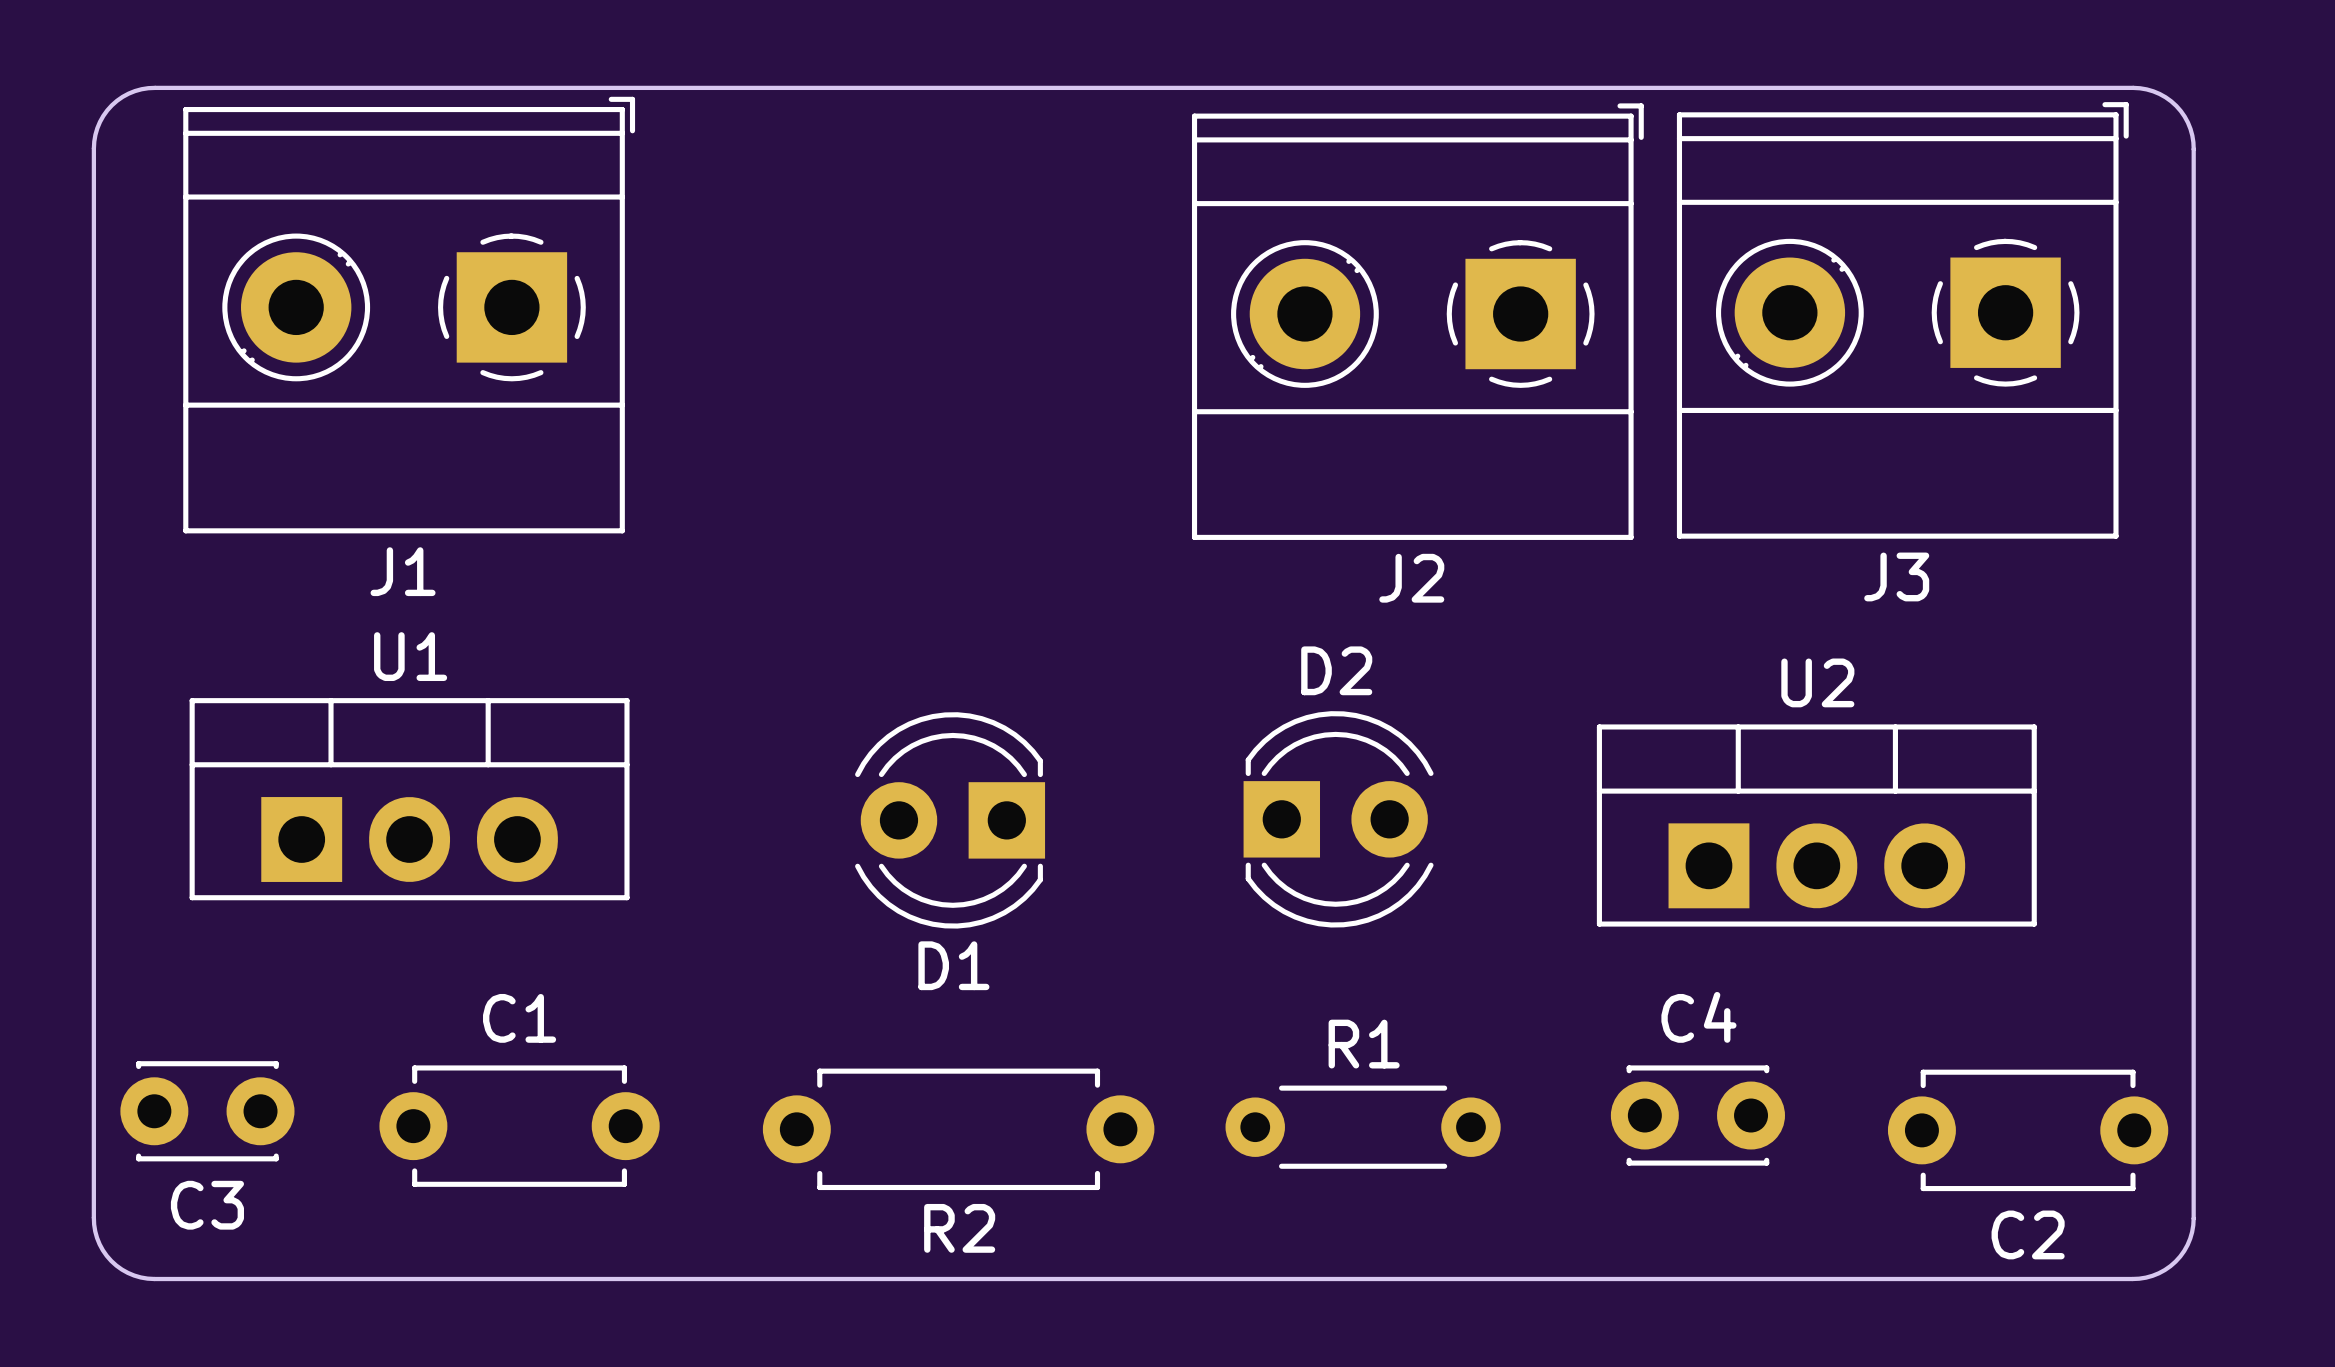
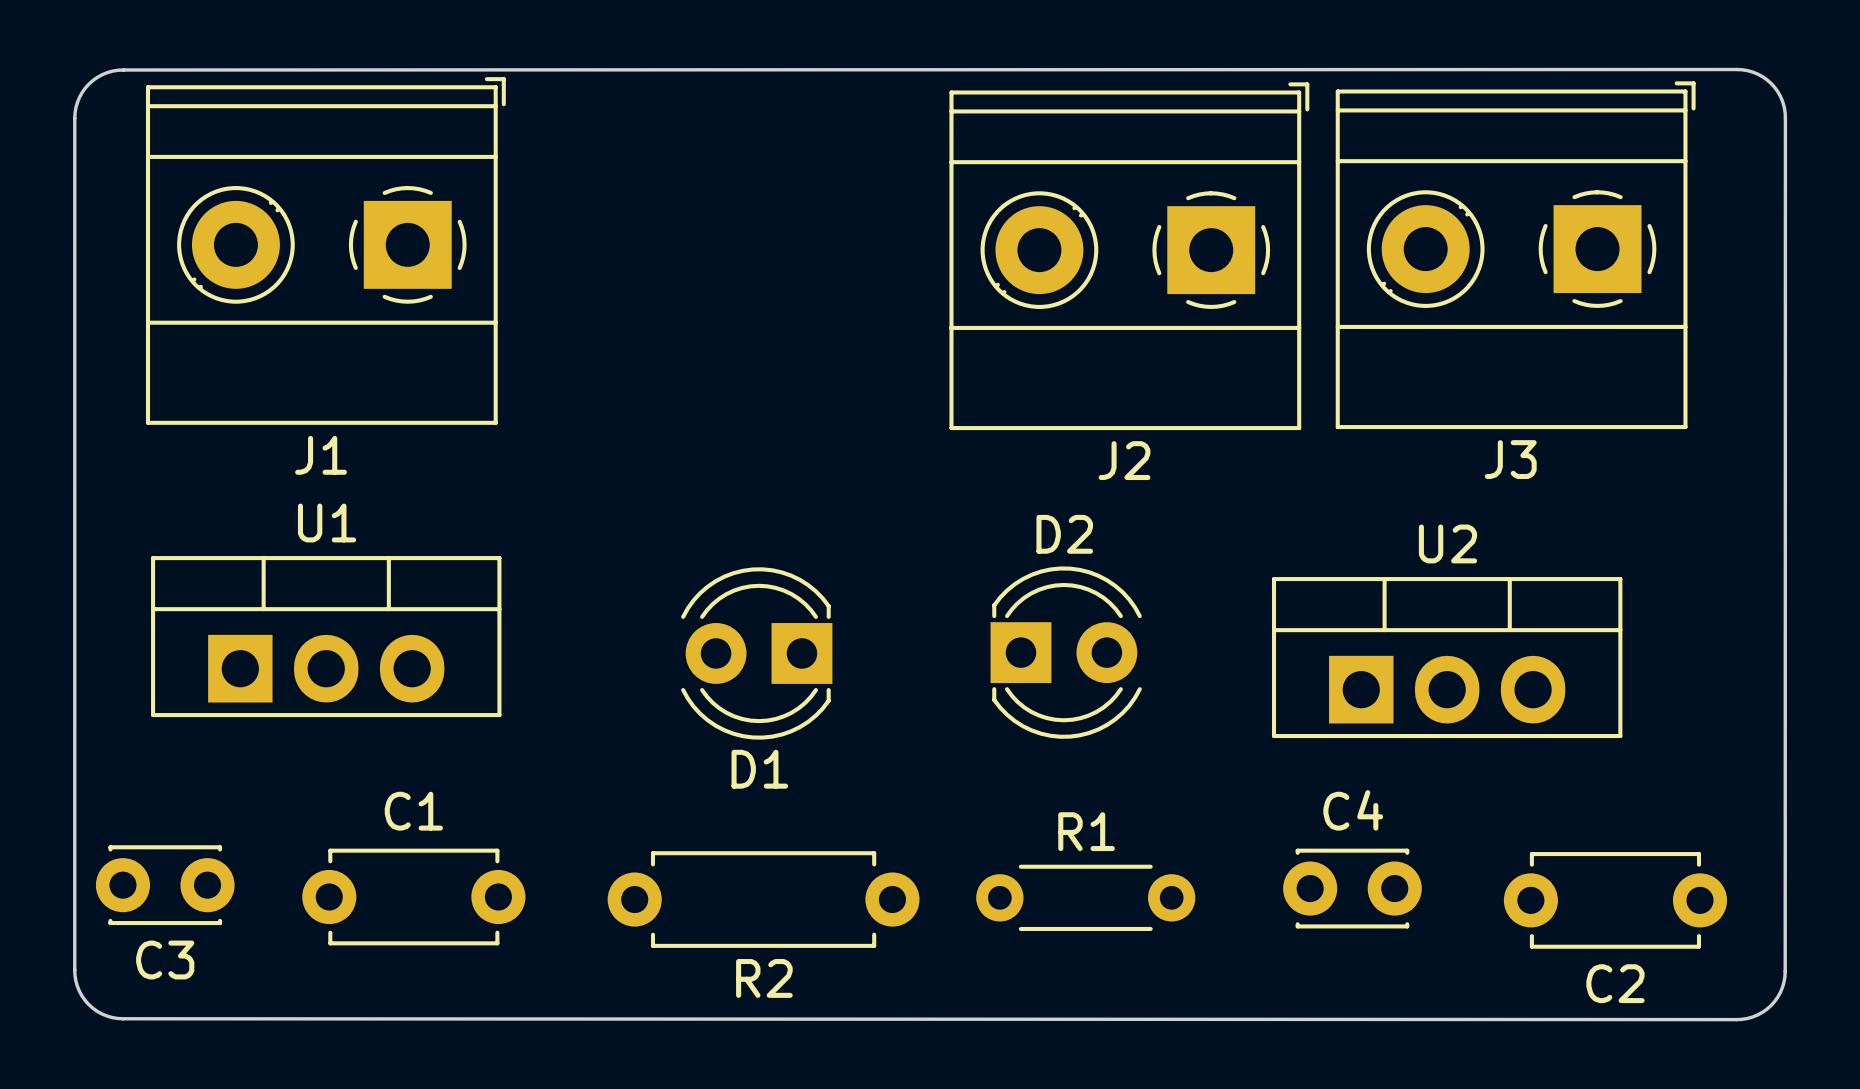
board edge: (155, 87) (2133, 87) (2146, 89) (2159, 93) (2176, 105) (2184, 116) (2192, 135) (2193, 149) (2193, 1218) (2192, 1232) (2187, 1244) (2175, 1261) (2164, 1270) (2152, 1275) (2132, 1279) (154, 1279) -> (123, 70) (1737, 69) (1758, 74) (1767, 80) (1778, 92) (1784, 107) (1785, 118) (1785, 971) (1782, 987) (1770, 1005) (1757, 1015) (1736, 1019) (122, 1018)

